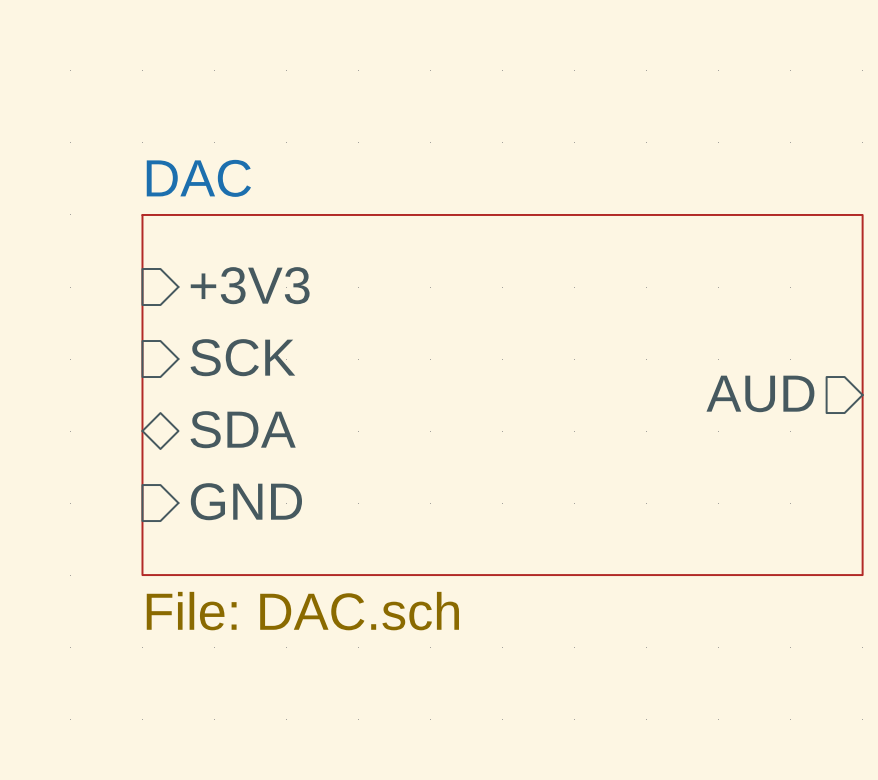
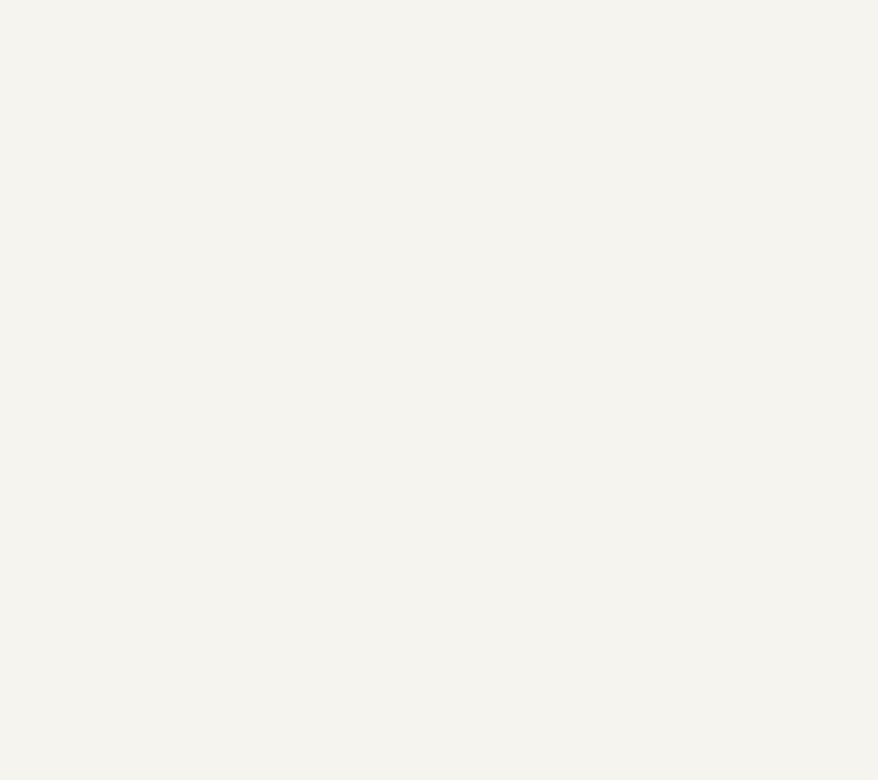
sheet pin: +3V3 (250, 285) -> none
sheet pin: SCK (242, 357) -> none
sheet pin: AUD (760, 393) -> none
sheet DAC: File: DAC.sch (502, 395) -> none
sheet pin: SDA (243, 429) -> none
sheet pin: GND (246, 501) -> none

